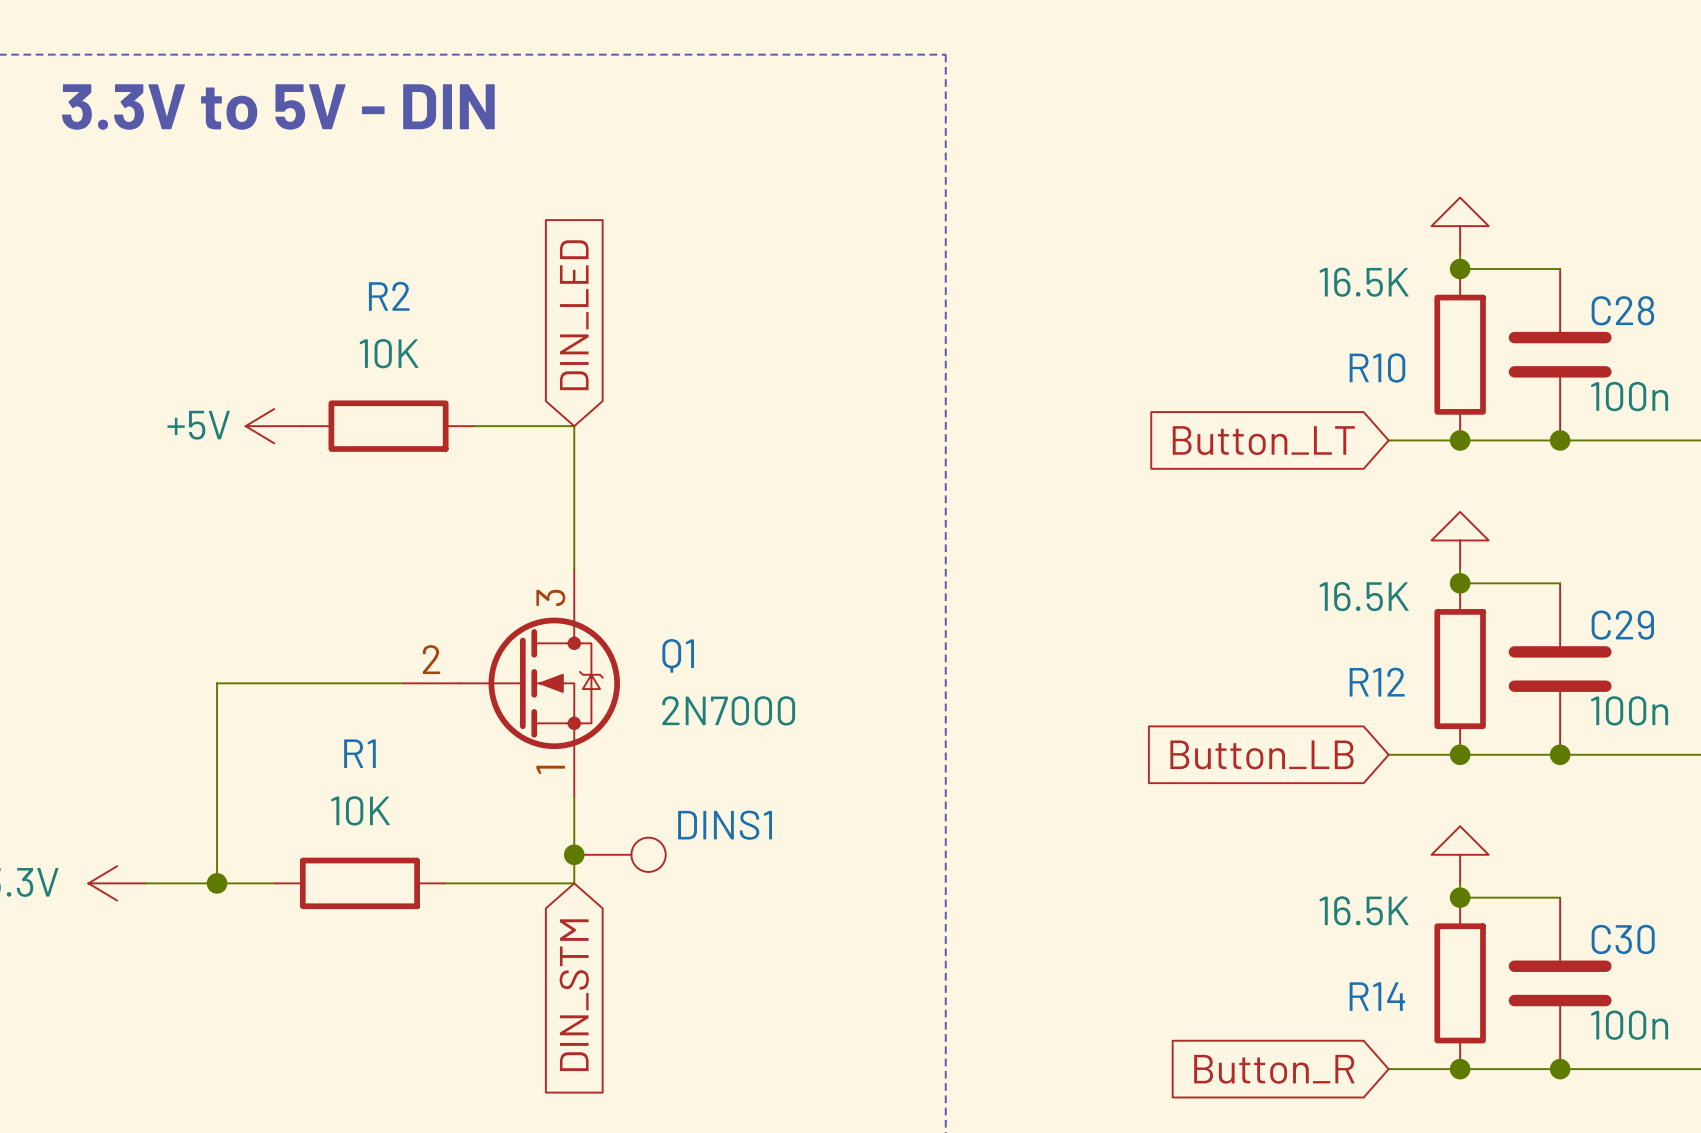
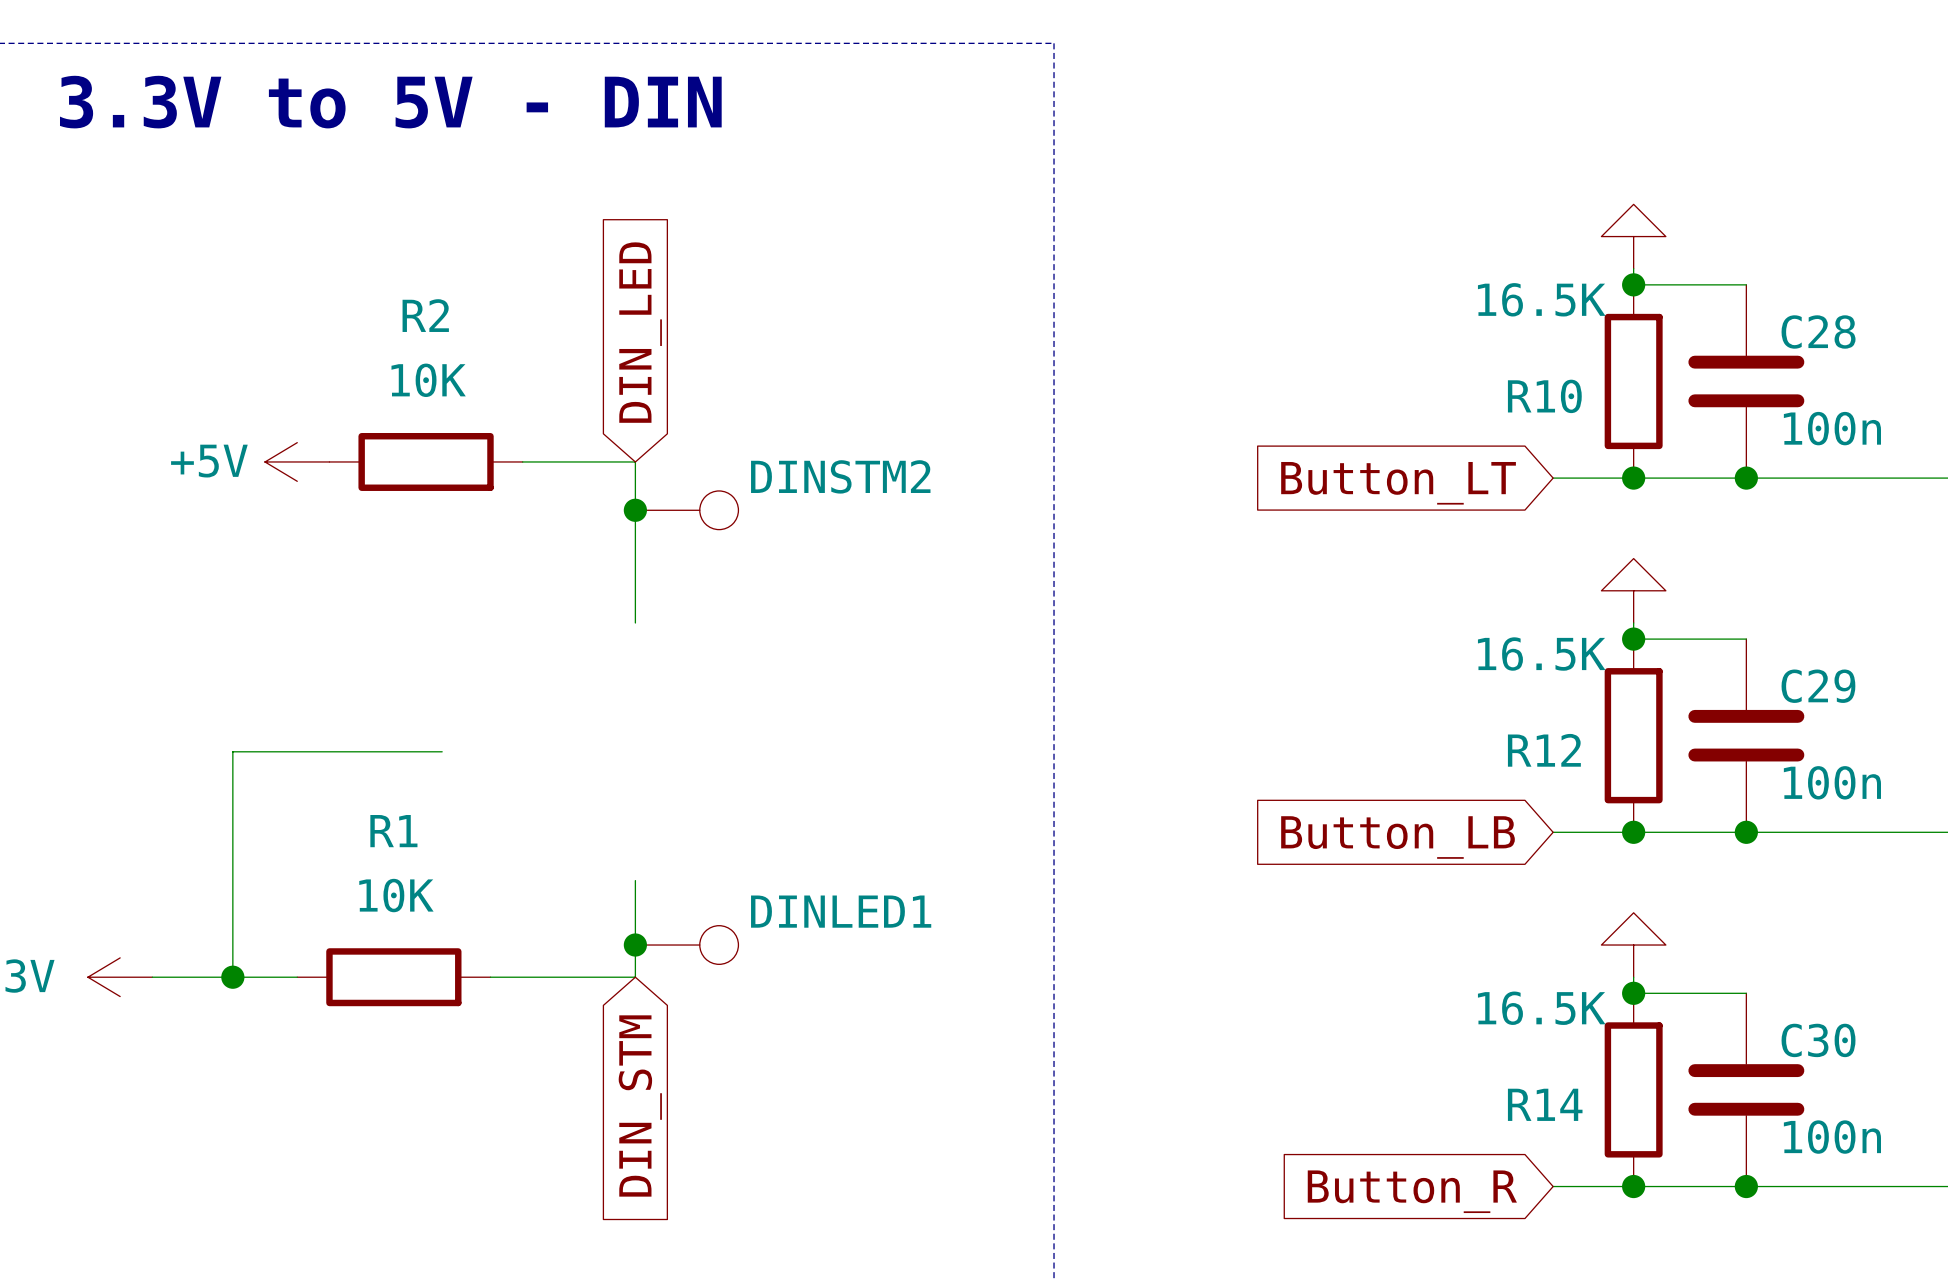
junction: none -> (635, 510)
DINSTM2: none -> (686, 510)
Q1: 2N7000 (511, 683) -> none
DINS1 name: DINS1 (725, 825) -> DINLED1 (841, 911)

